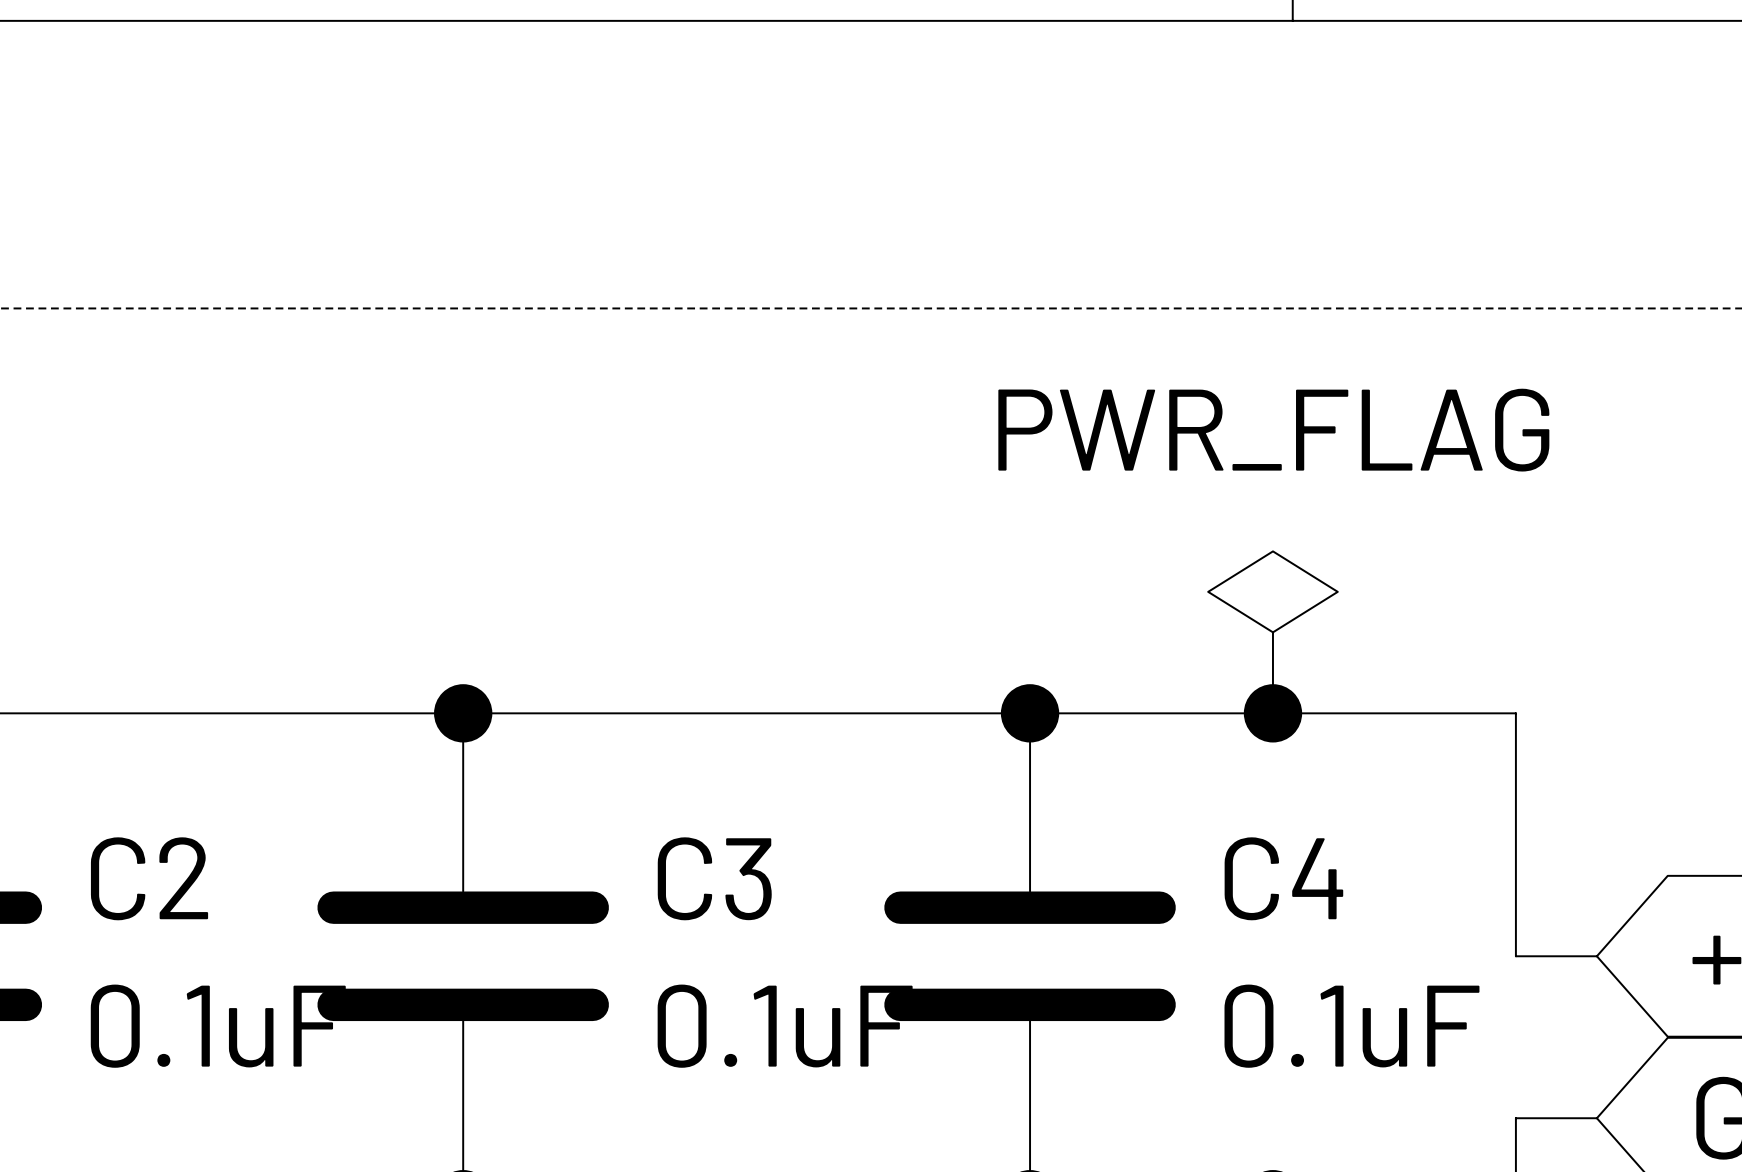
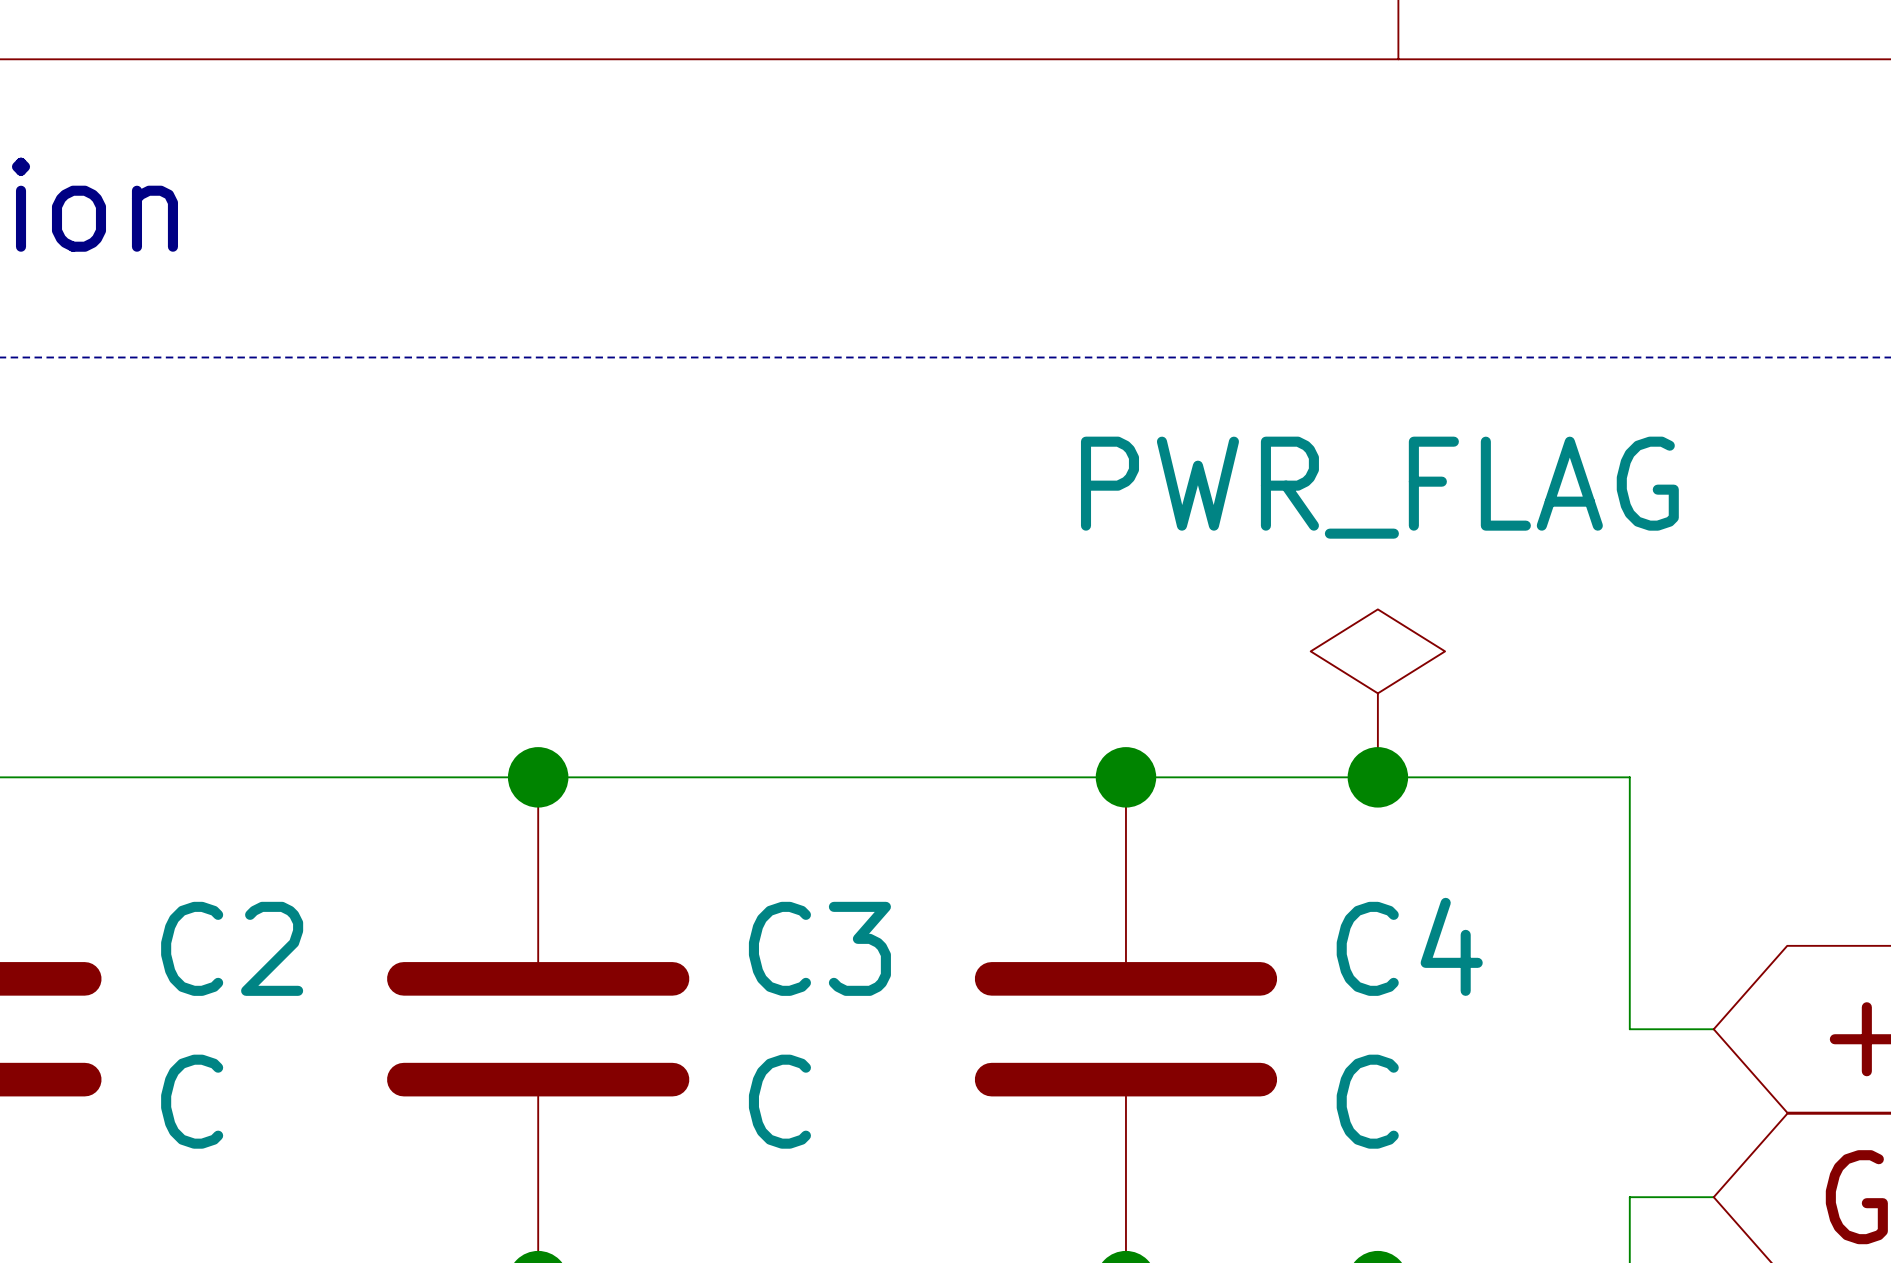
C2 value: 0.1uF (218, 1026) -> C (192, 1101)
C3 value: 0.1uF (785, 1026) -> C (779, 1101)
C4 value: 0.1uF (1351, 1026) -> C (1367, 1101)

